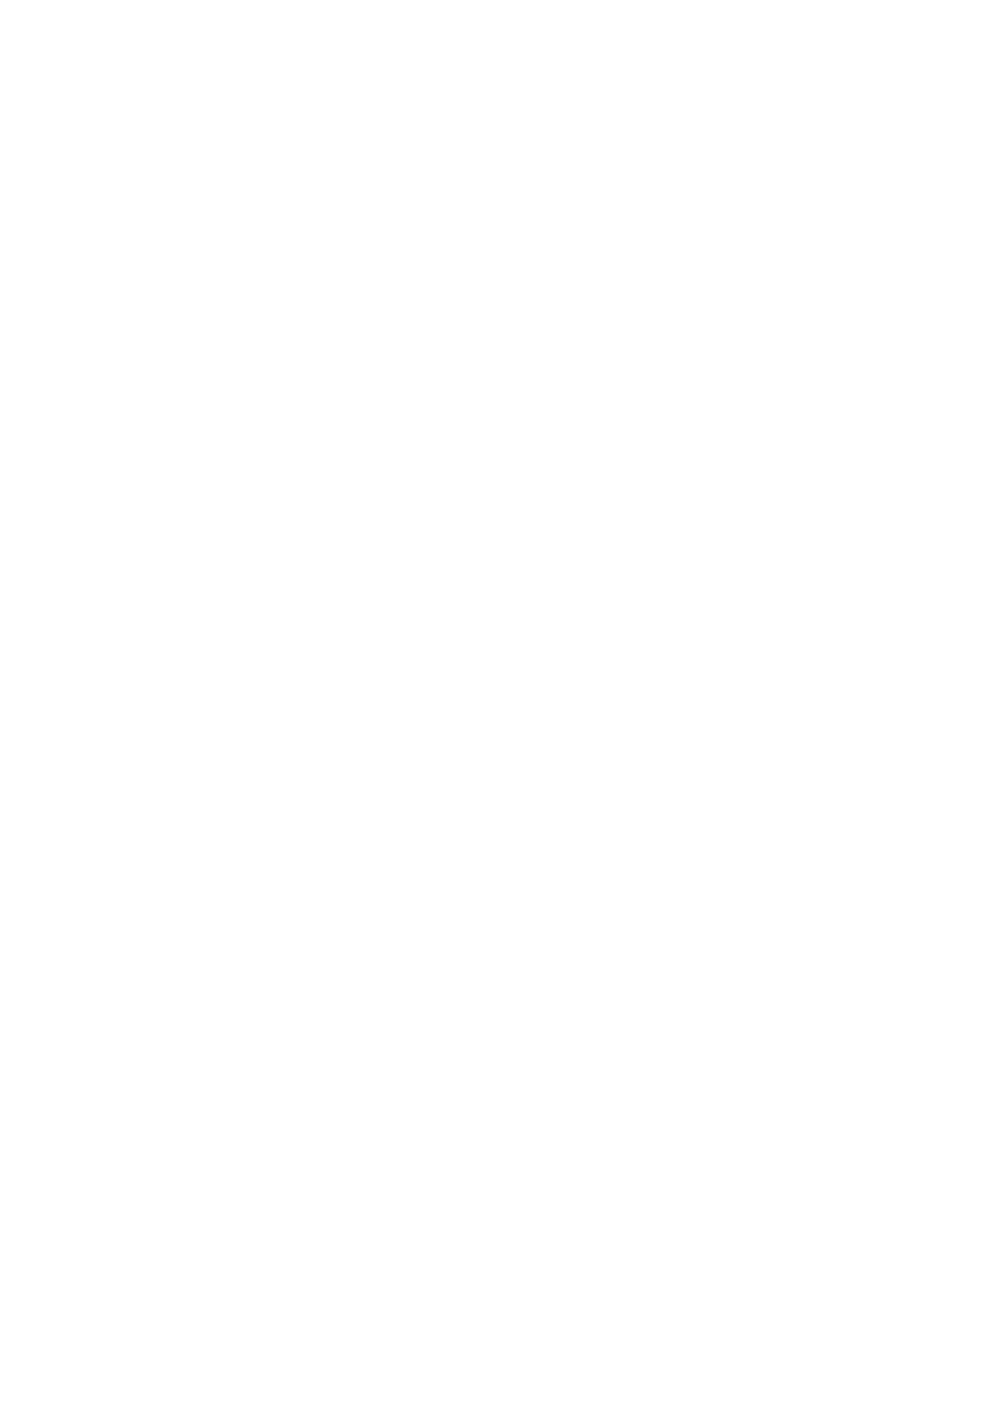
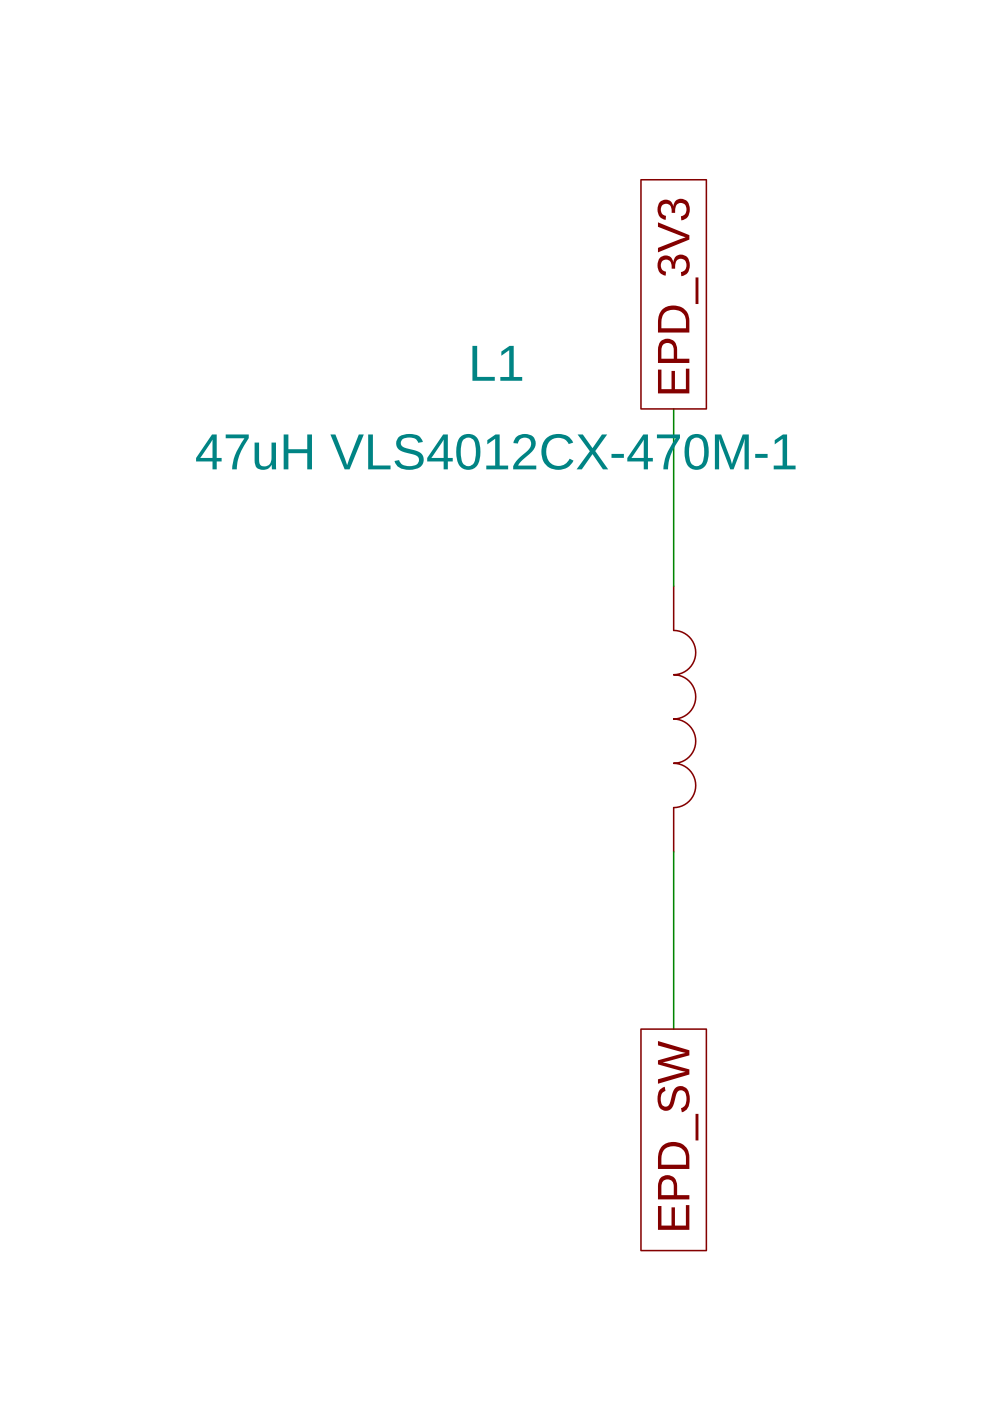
global label: none -> EPD_3V3 (677, 296)
wire: none -> (673, 408) (673, 586)
L1: none -> 47uH VLS4012CX-470M-1 (684, 719)
wire: none -> (673, 851) (673, 1029)
global label: none -> EPD_SW (677, 1135)

